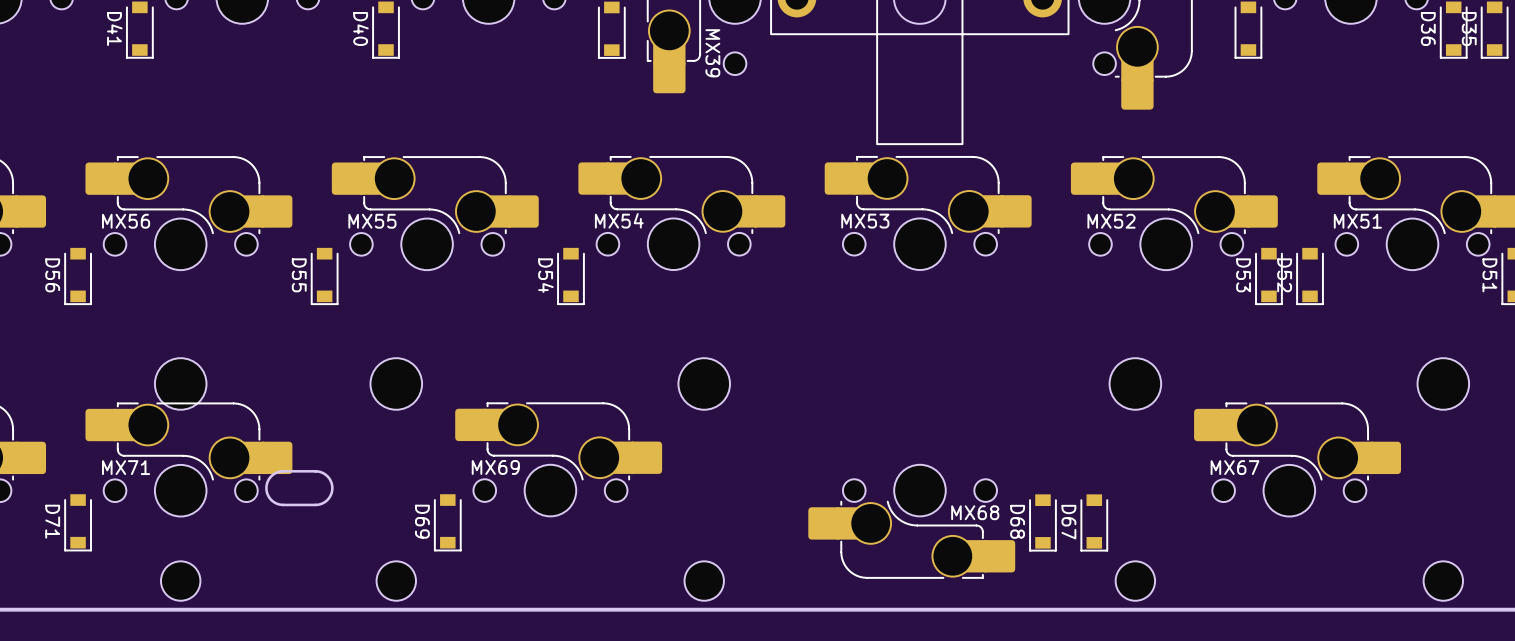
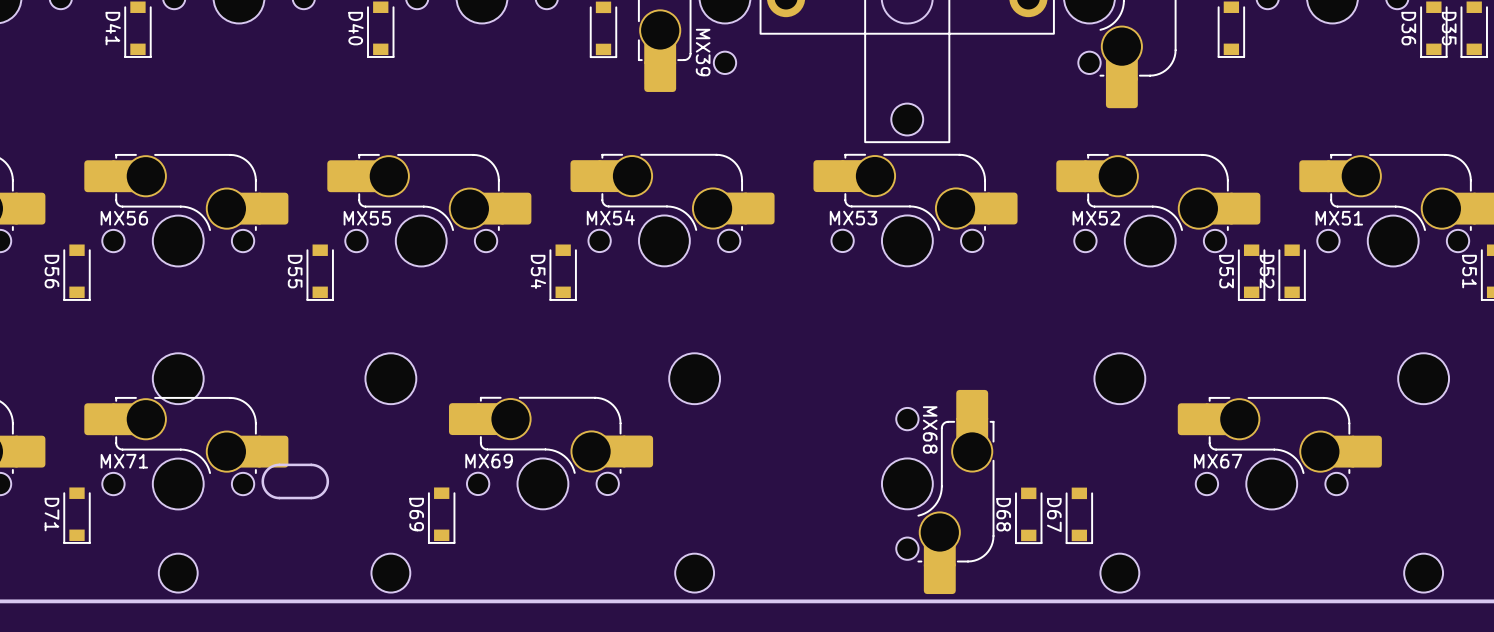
part: none -> (907, 119)
MX68 rotation: 0° (911, 521) -> 90° counterclockwise (938, 491)

